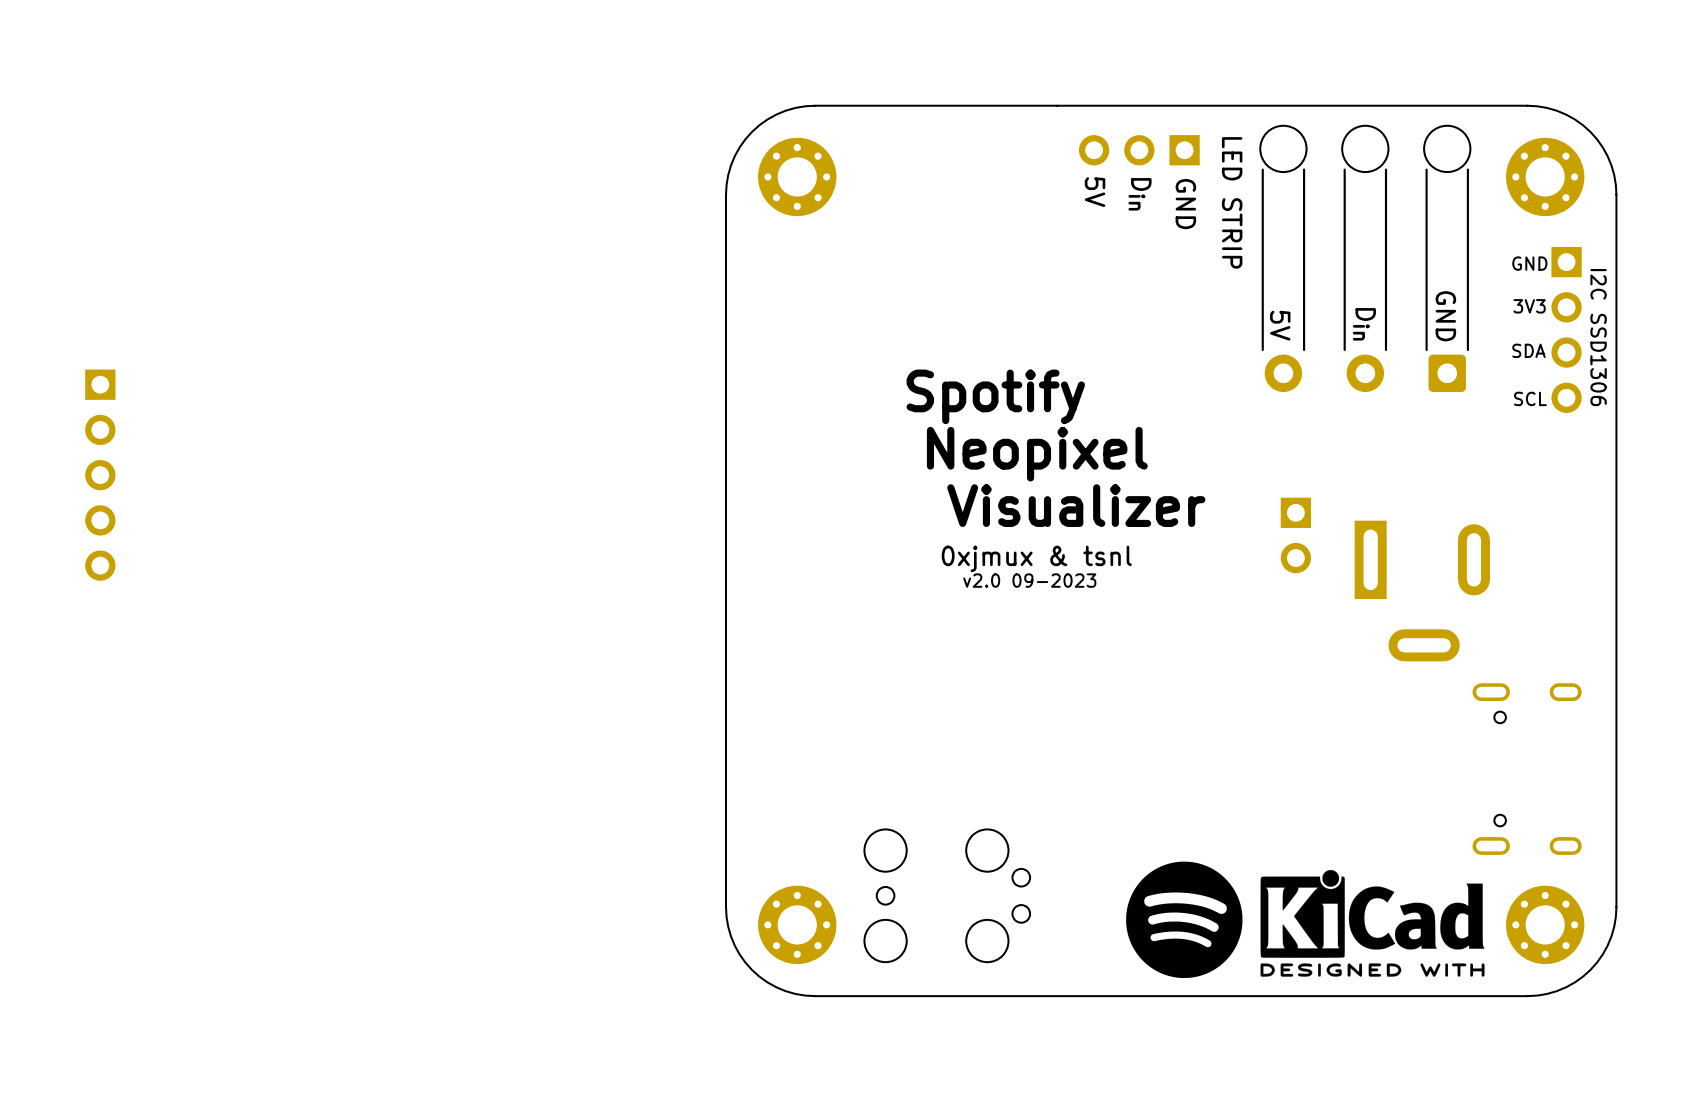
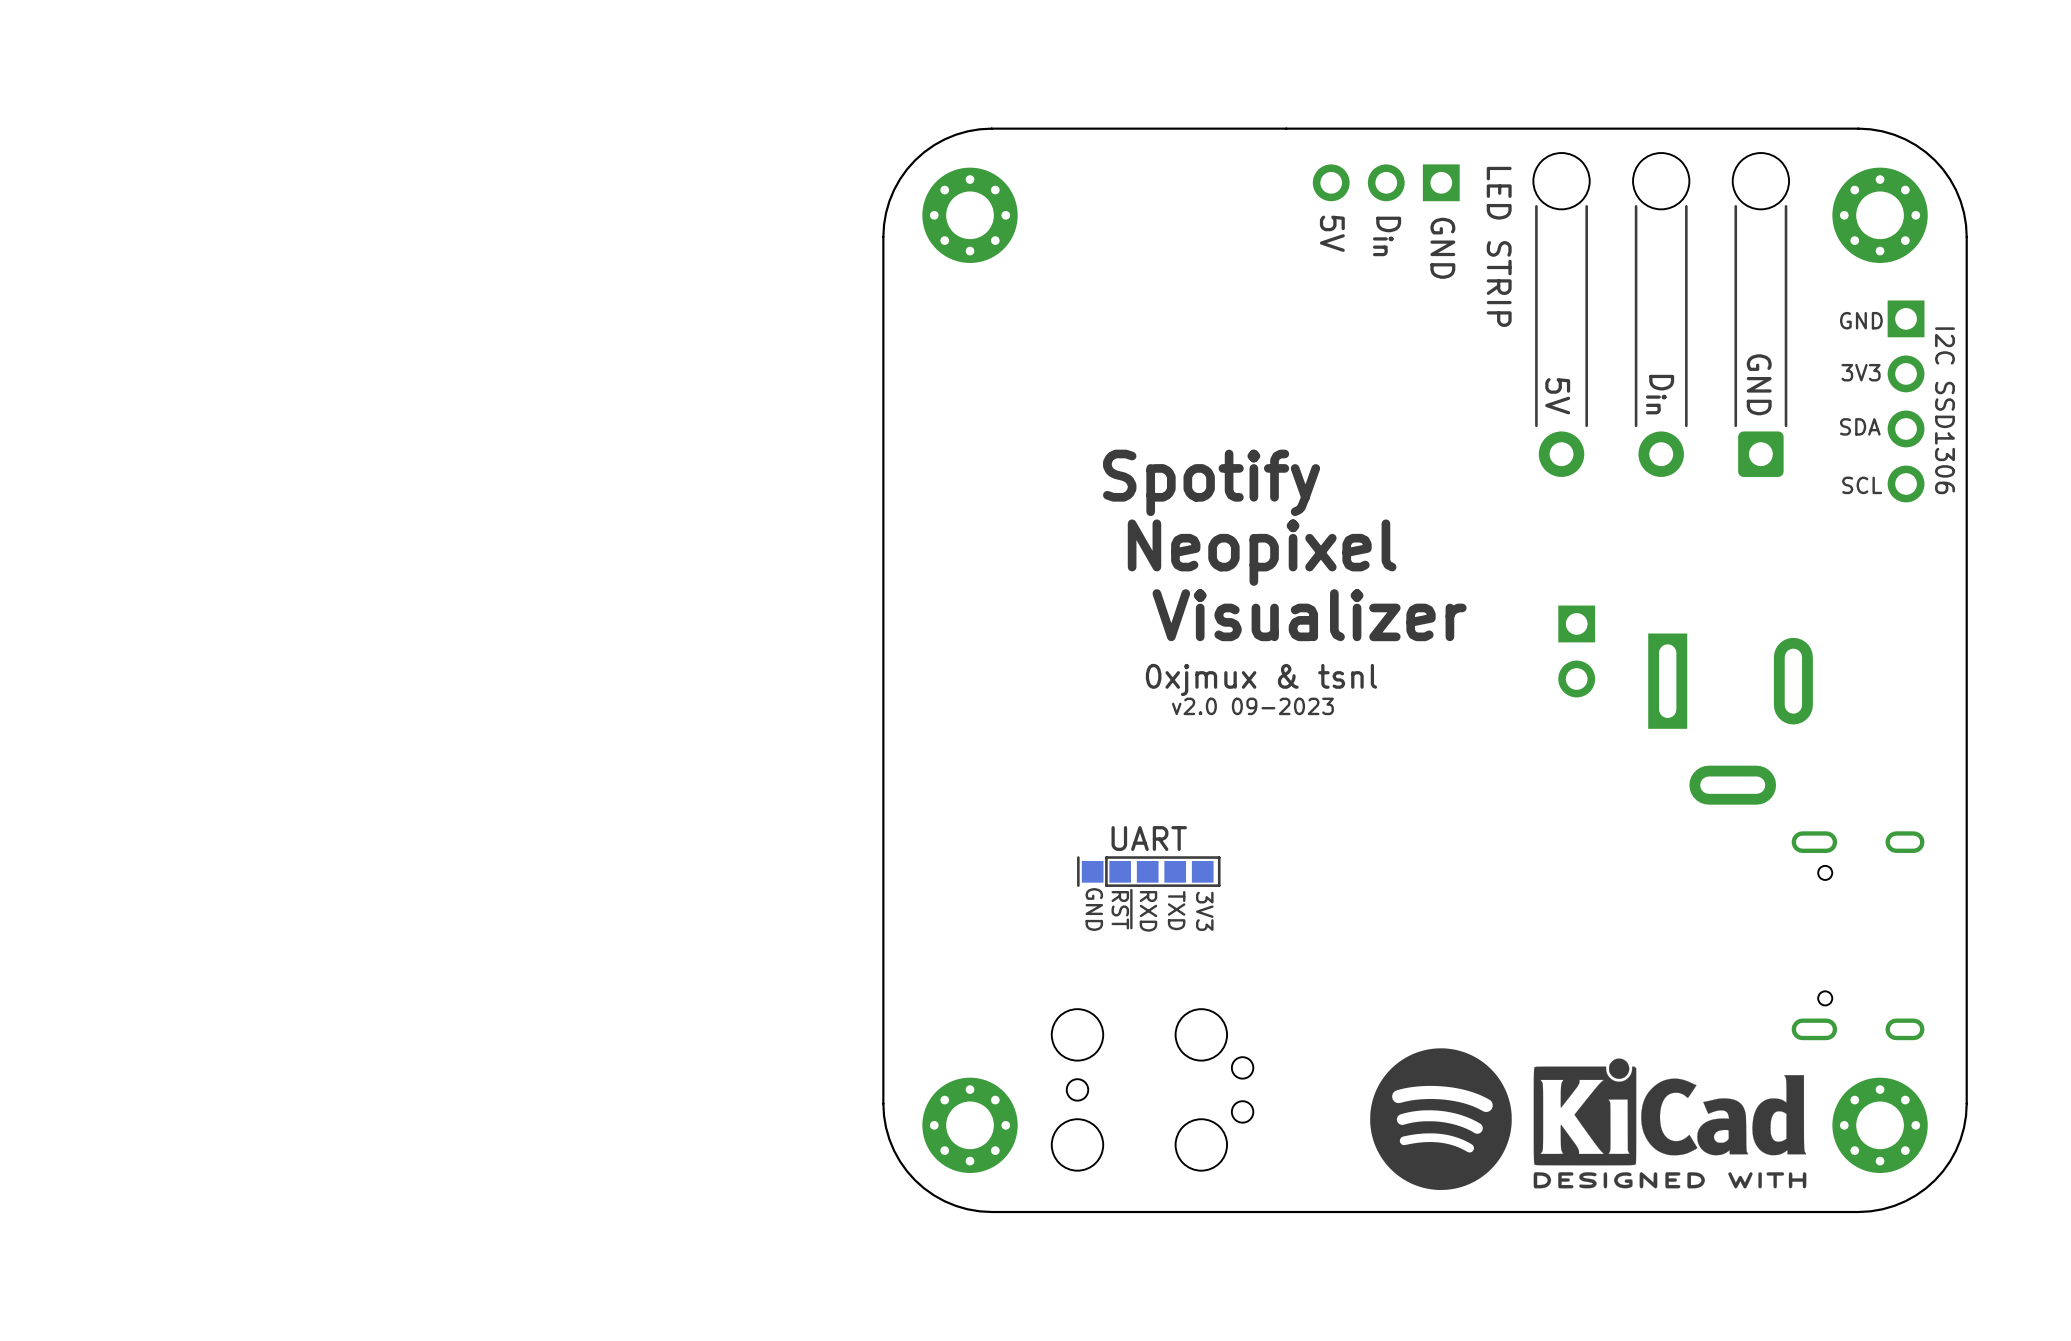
part: (100, 475) -> none
part: none -> UART (1148, 871)
text: none -> GND (1094, 909)
text: none -> ~{RST} (1122, 909)
text: none -> TXD (1176, 910)
text: none -> RXD (1148, 911)
text: none -> 3V3 (1204, 911)

